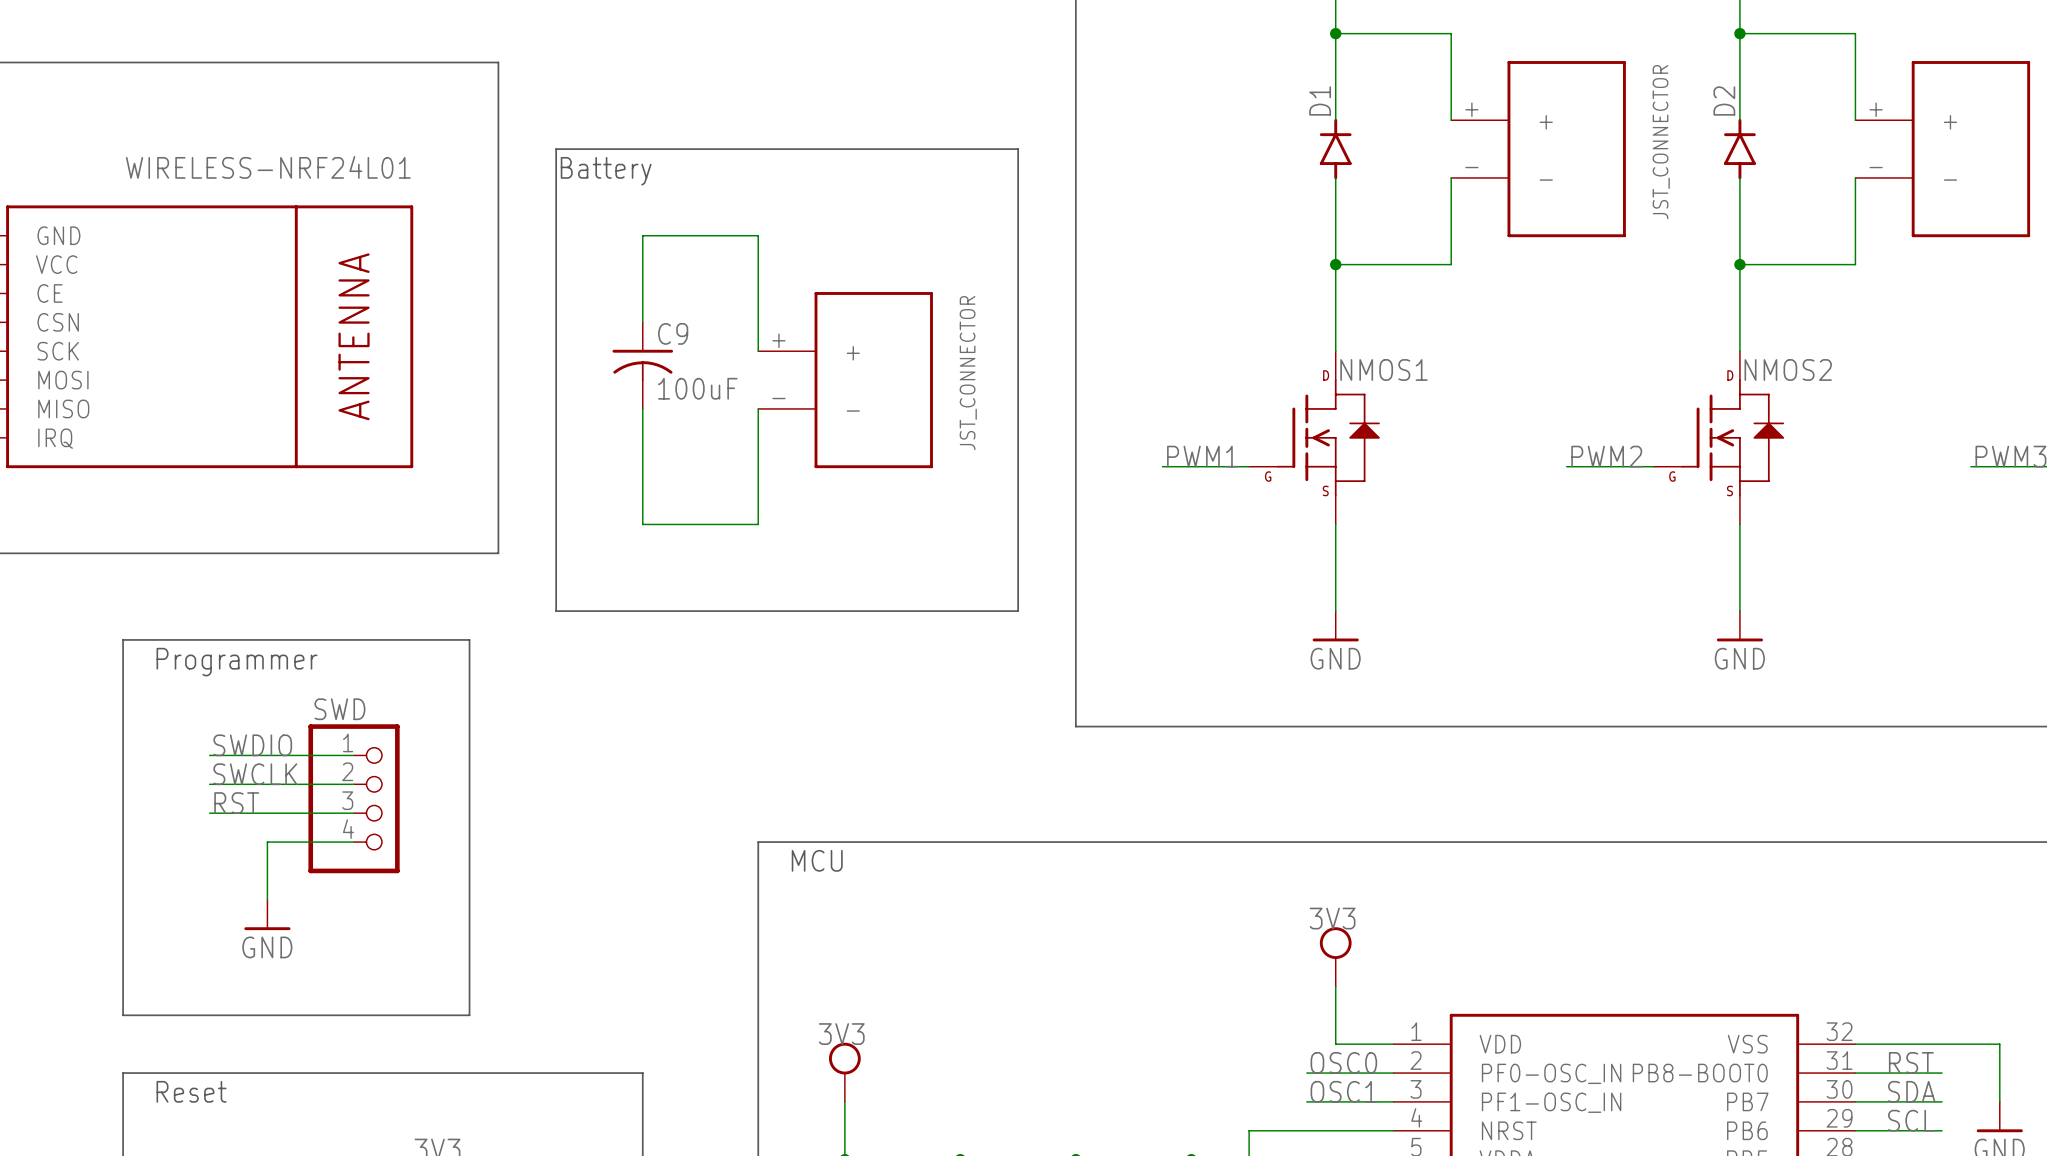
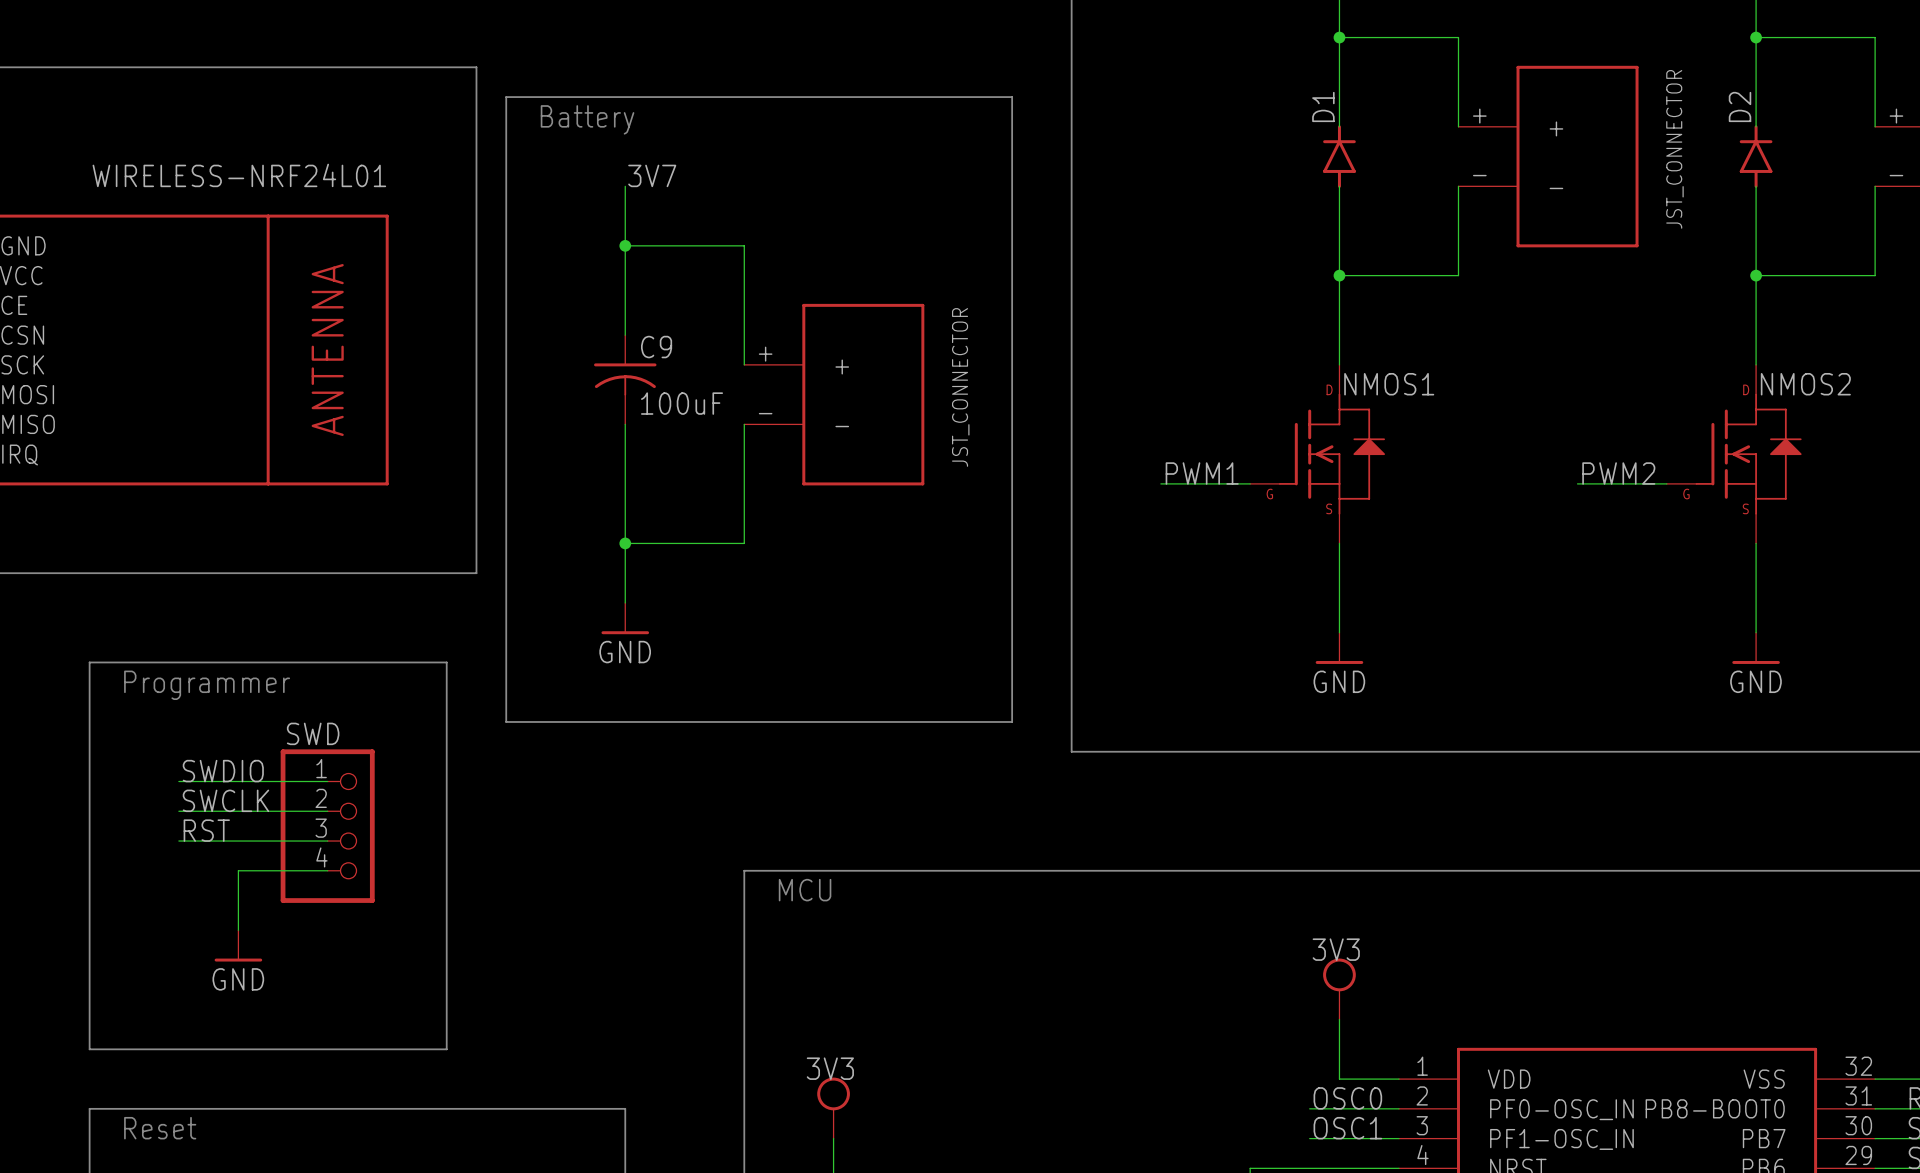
line: (1018, 149) (556, 149) (556, 611) (1018, 611) -> (1012, 156) (1012, 97) (506, 97) (506, 721) (1012, 721) (1012, 632)
label: none -> 3V7 (652, 175)
text position: Battery (606, 171) -> Battery (587, 119)
wire: none -> (625, 186) (625, 245)
junction: none -> (625, 245)
wire: none -> (625, 543) (625, 602)
junction: none -> (625, 543)
power symbol: none -> (625, 618)
label: none -> GND (625, 652)

